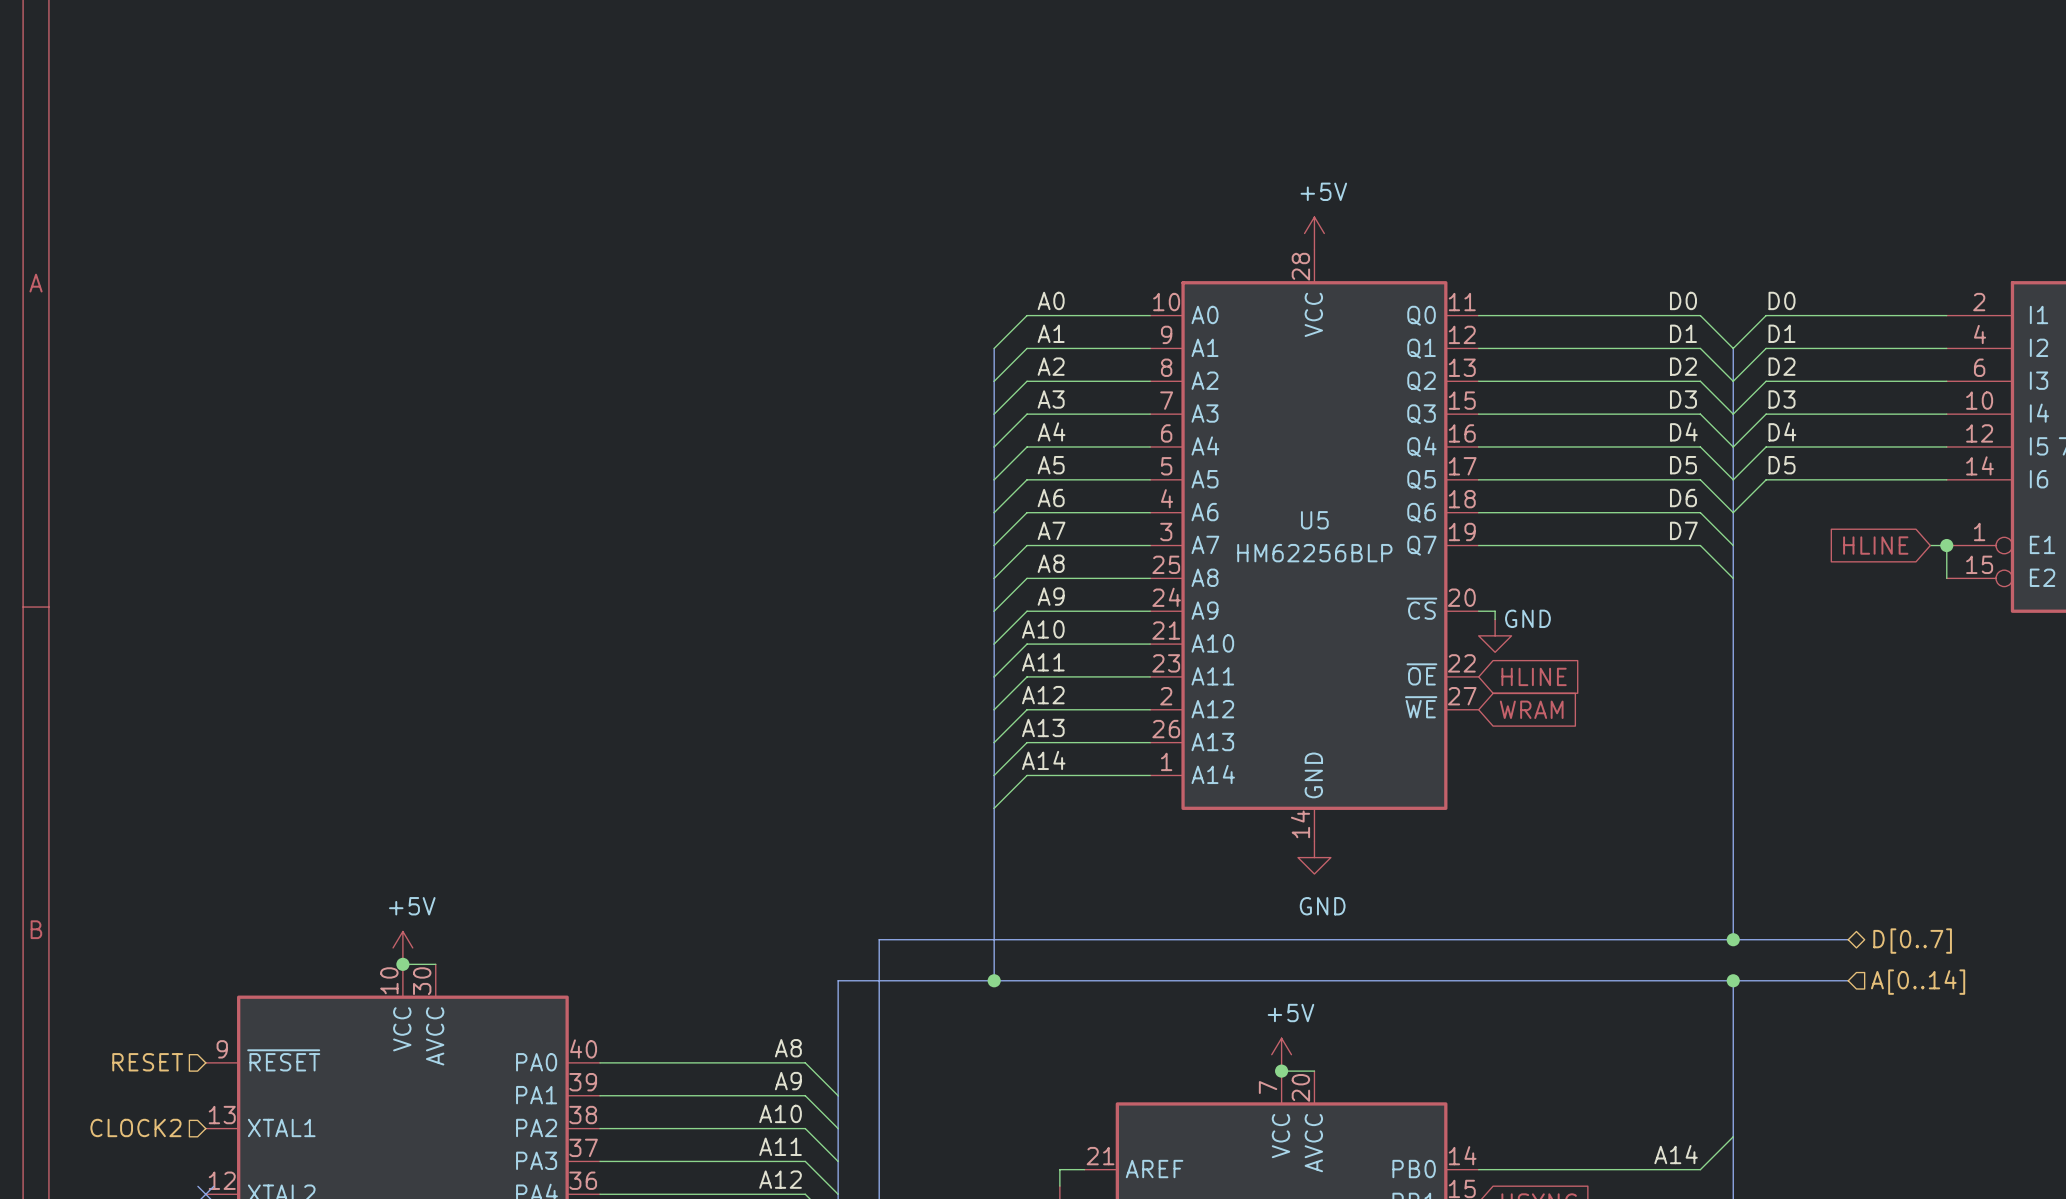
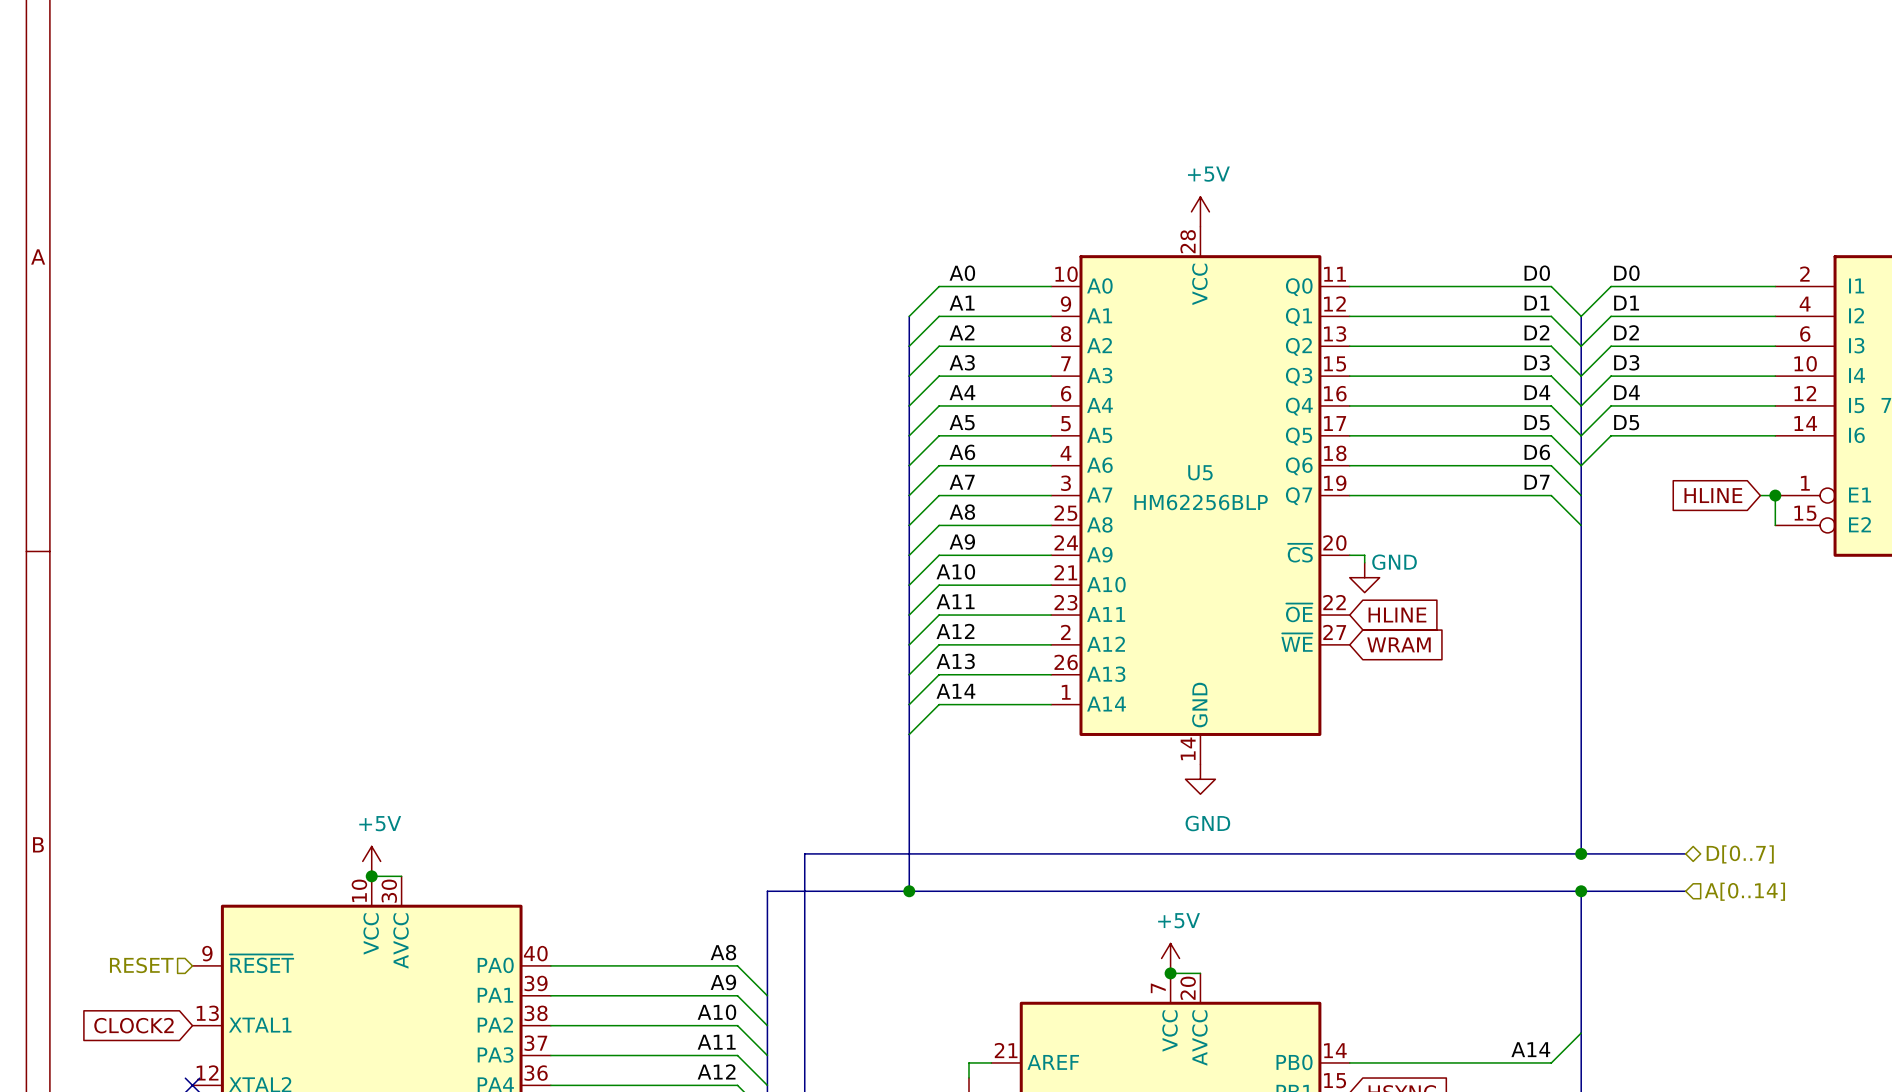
hierarchical label: CLOCK2 (135, 1127) -> none
global label: none -> CLOCK2 (133, 1025)

